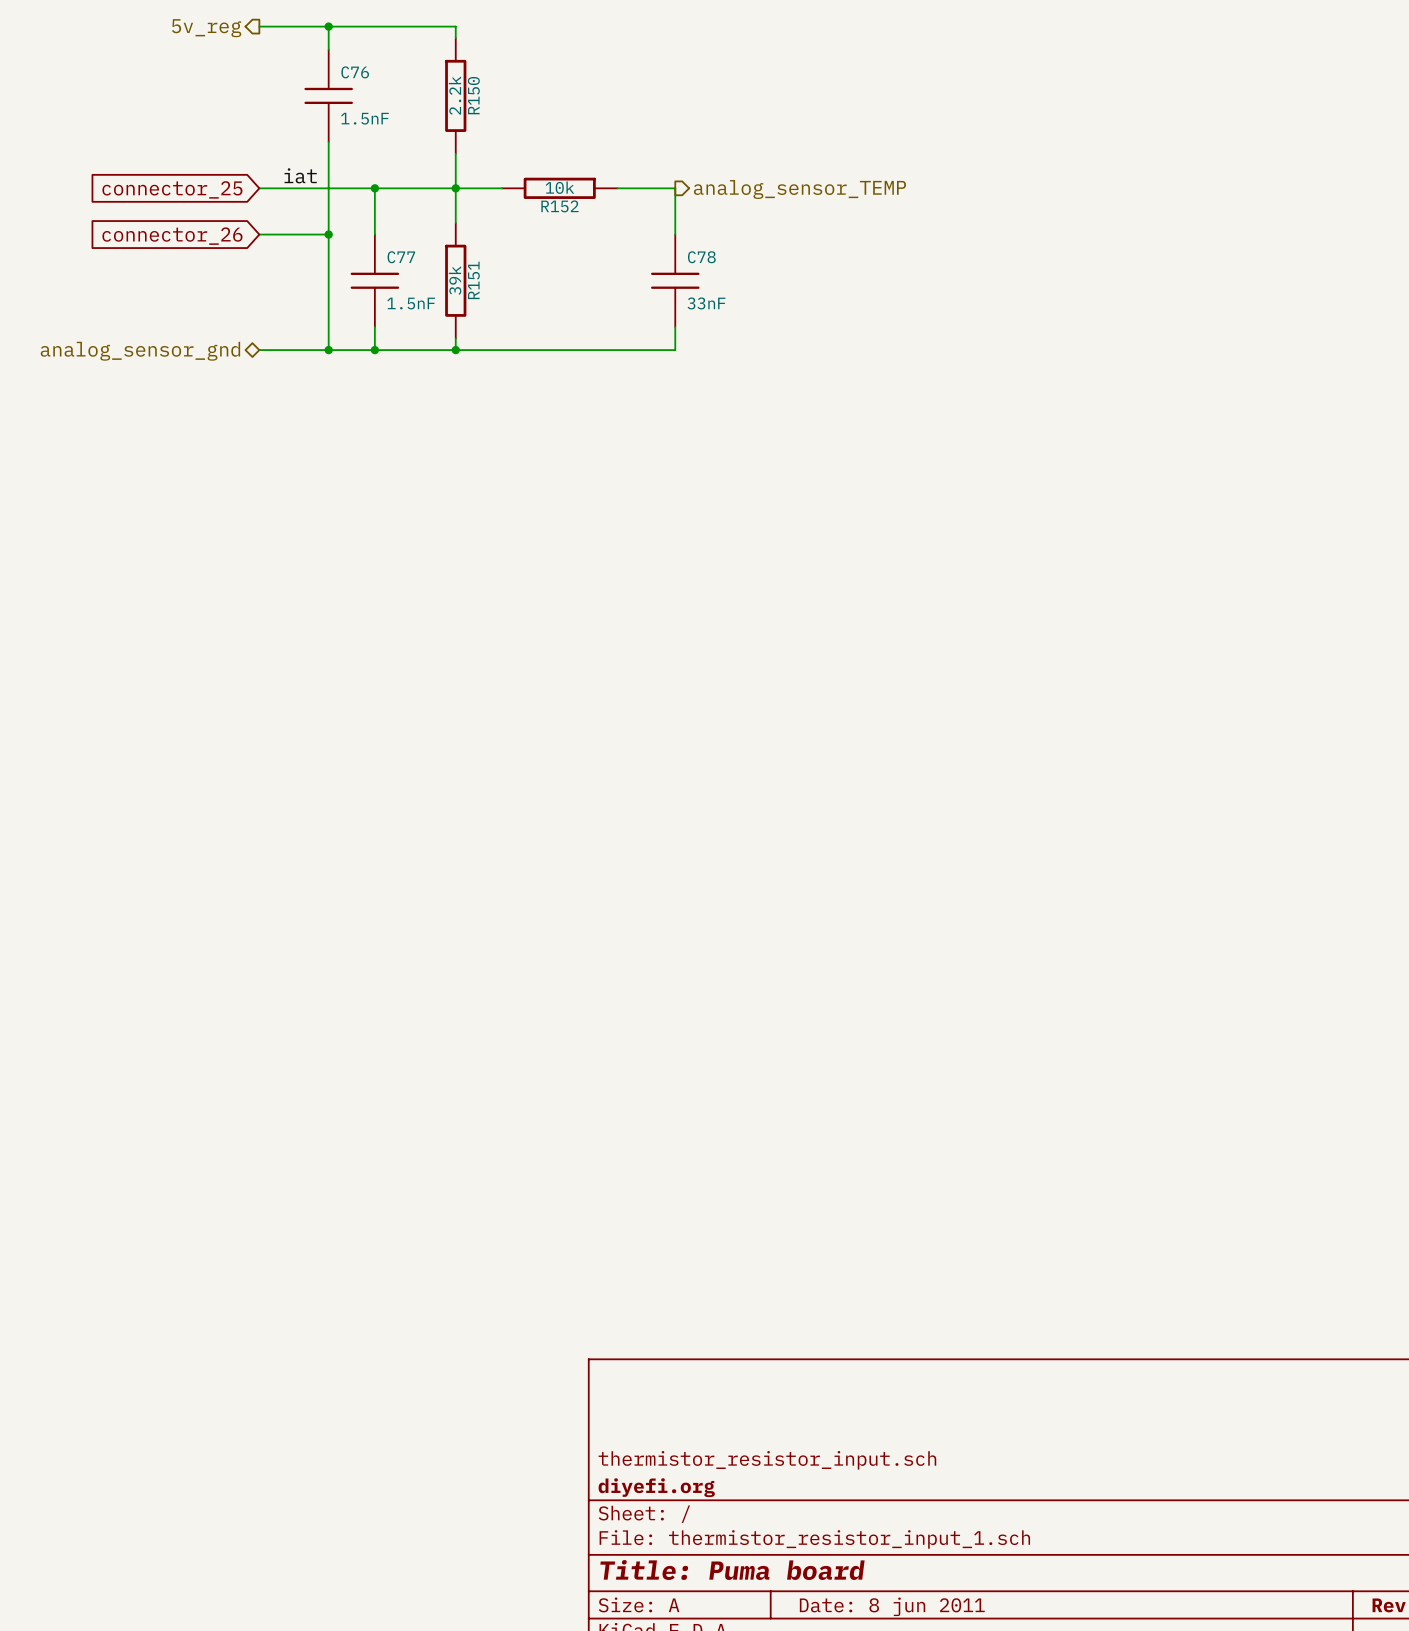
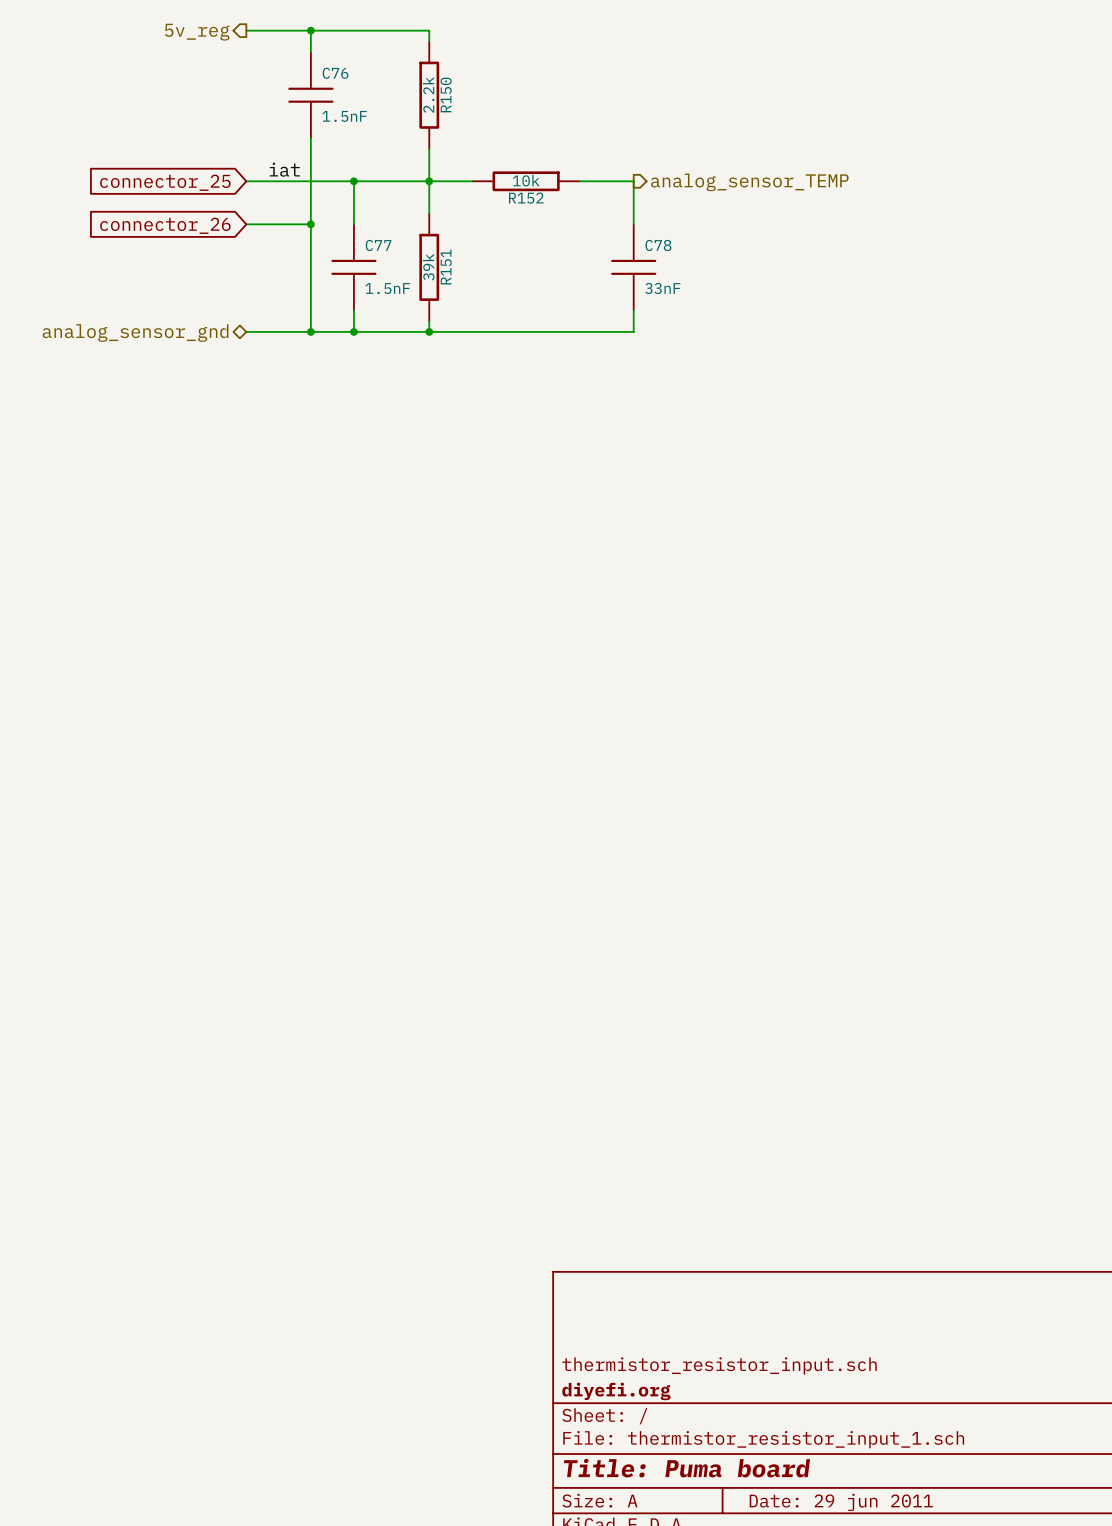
title block: Date: 8 jun 2011 (892, 1606) -> Date: 29 jun 2011 (841, 1502)

